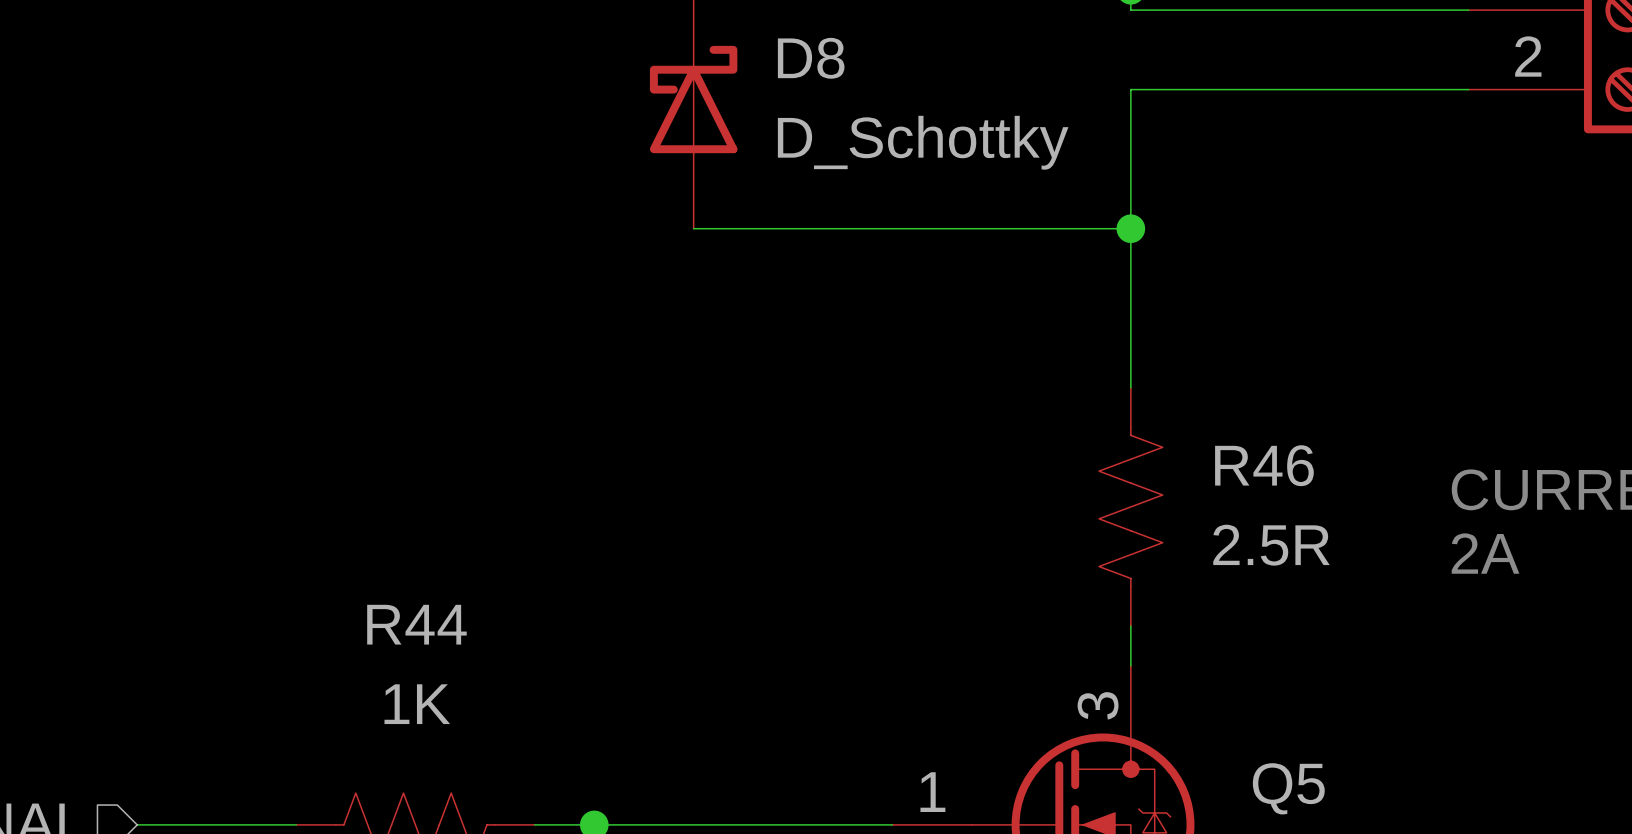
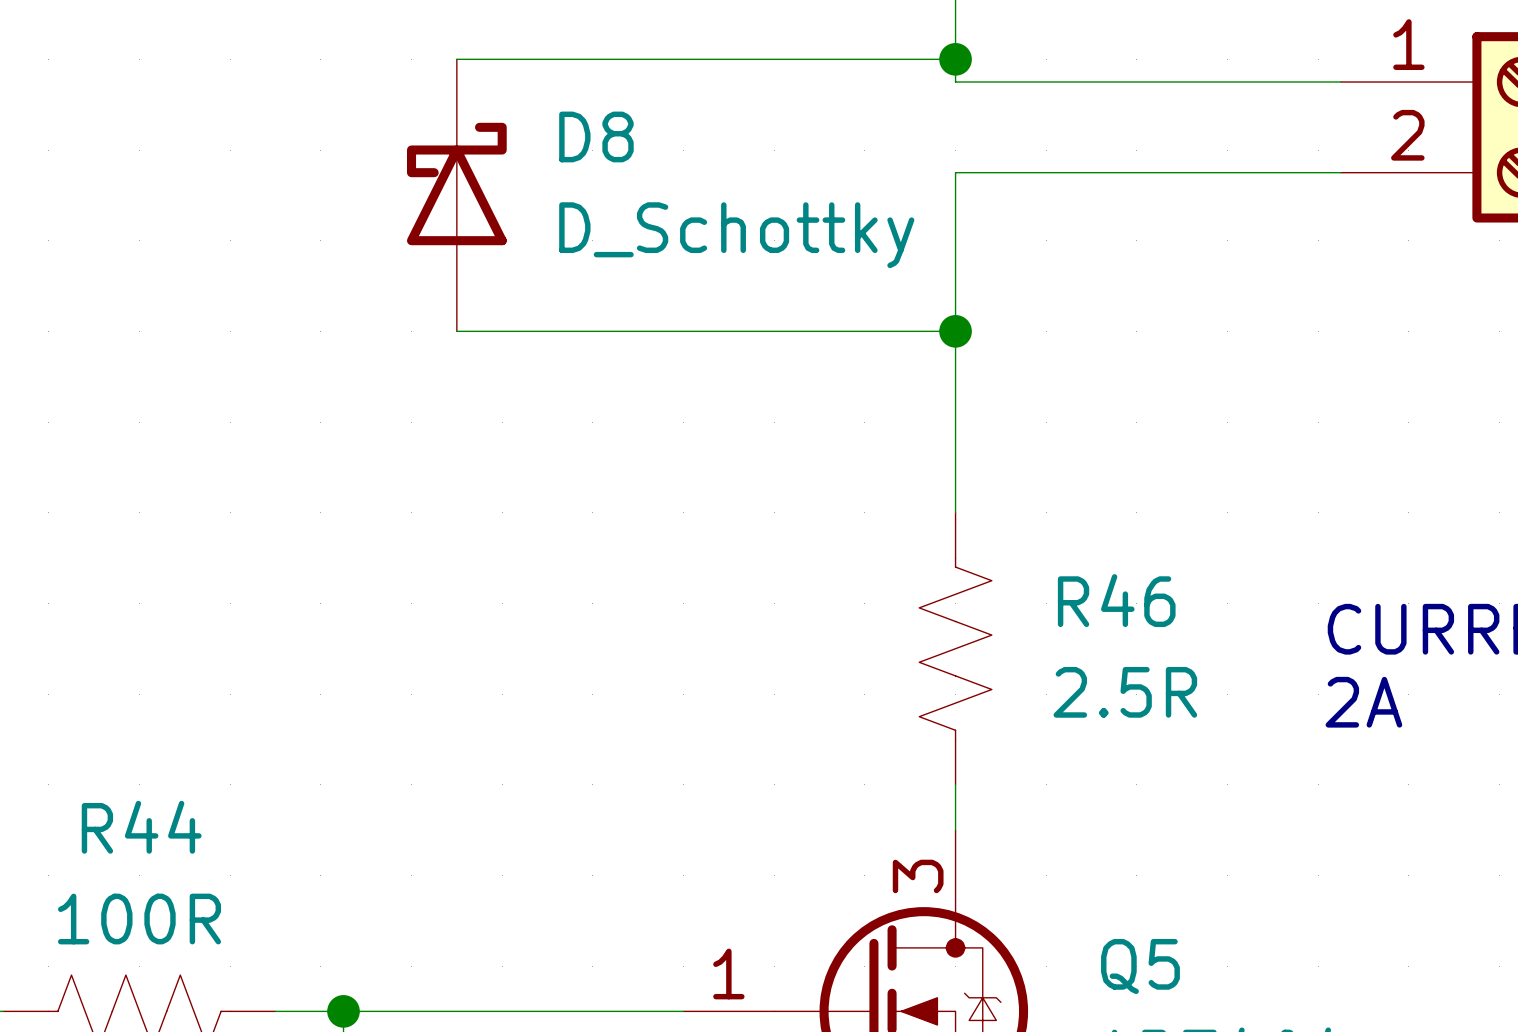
R44 name position: R44 (416, 624) -> R44 (141, 827)
R44 value: 1K (417, 704) -> 100R (139, 919)

